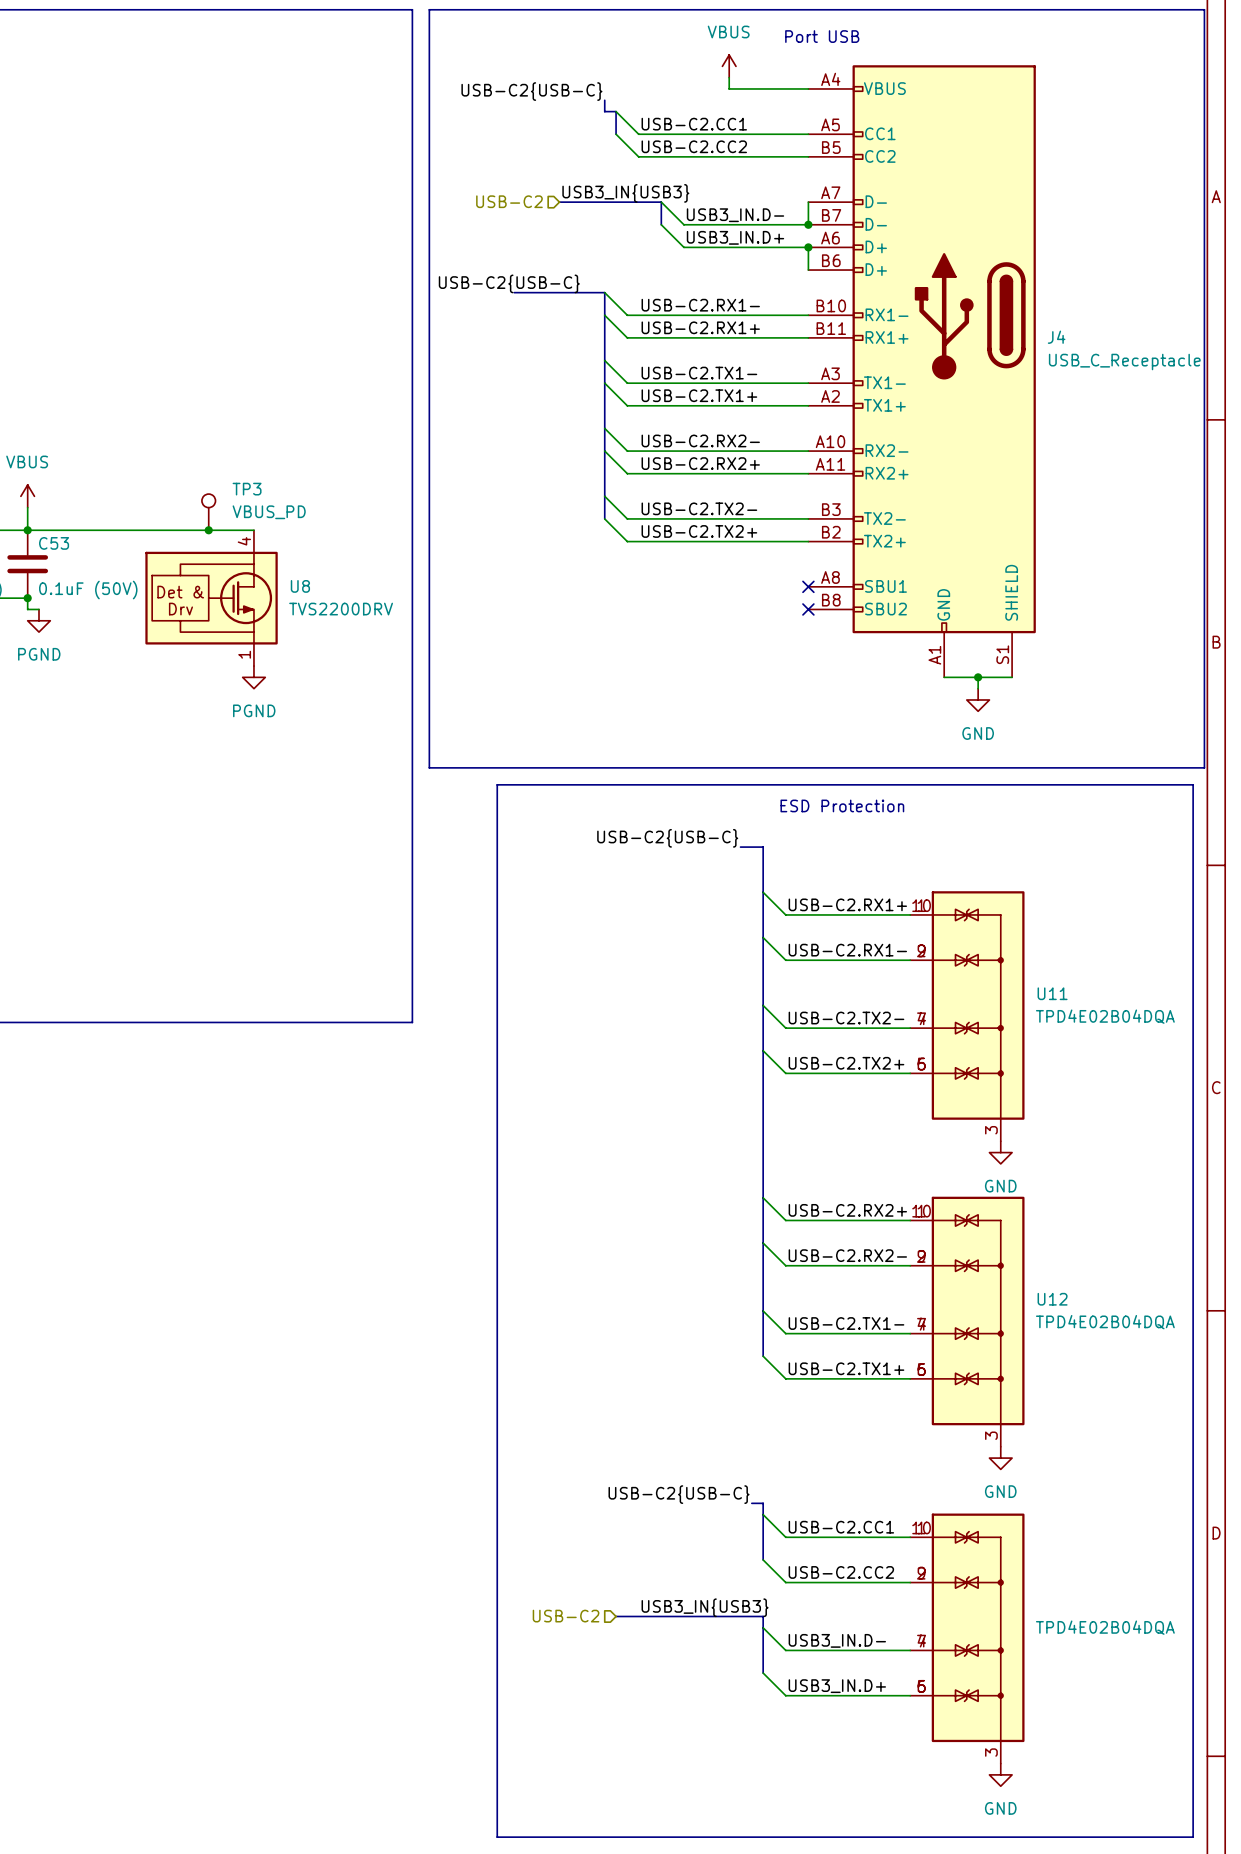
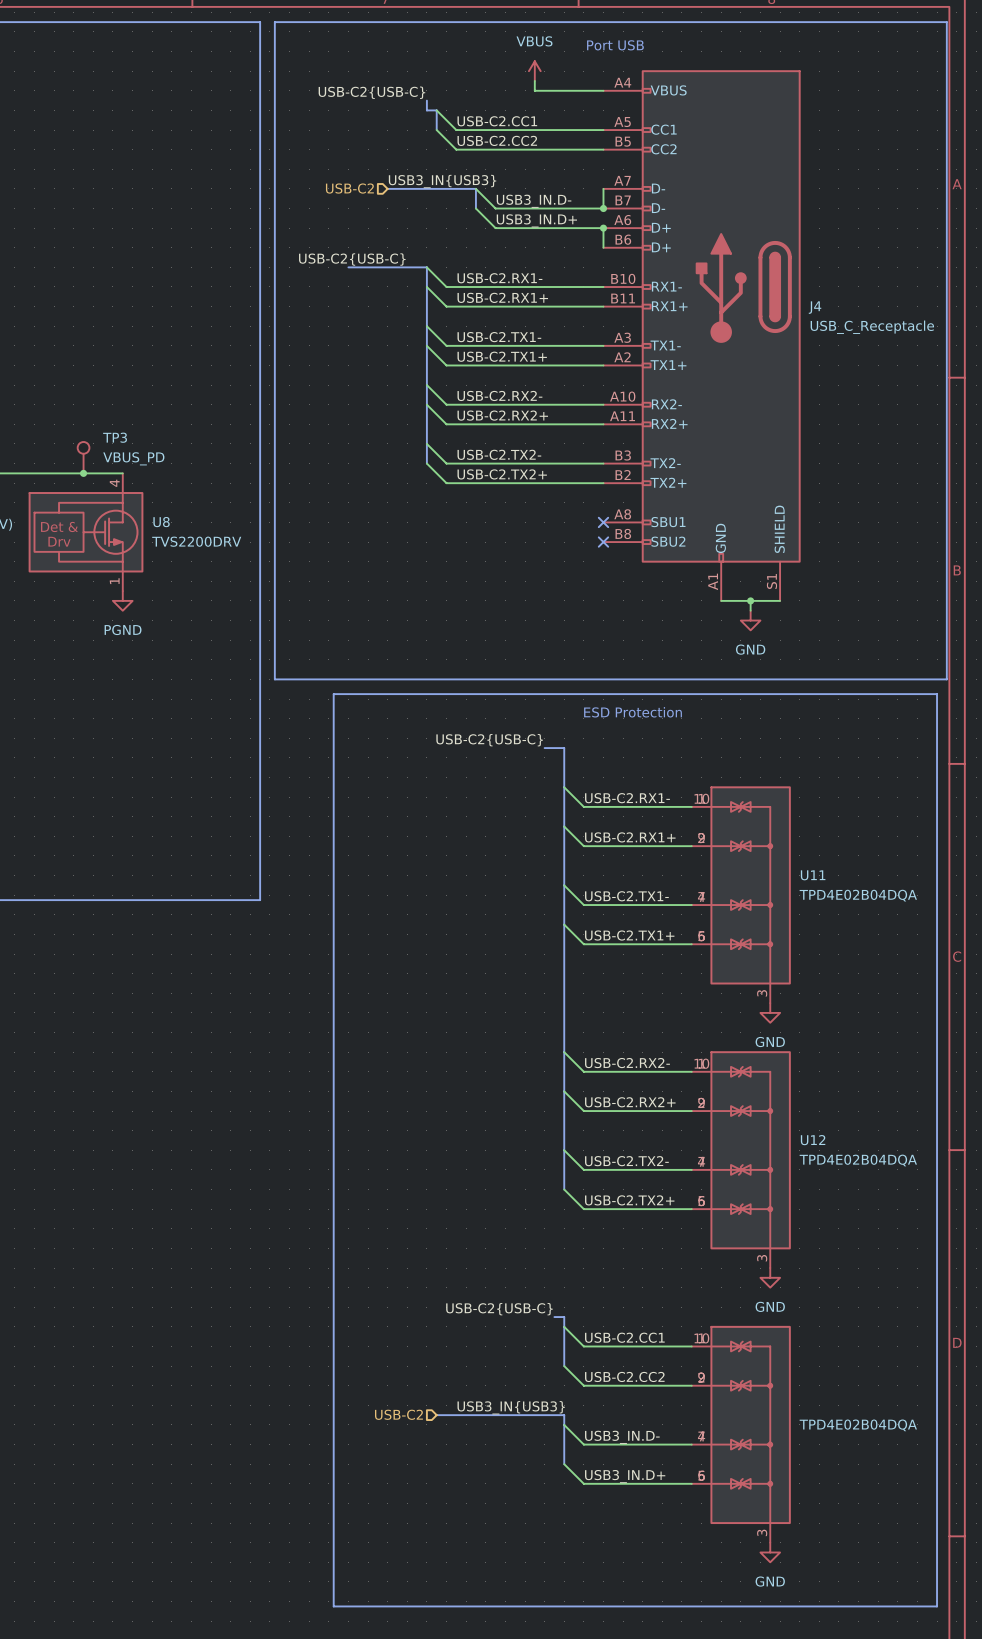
label: USB-C2.RX1+ (847, 904) -> USB-C2.RX1- (627, 798)
label: USB-C2.RX1- (847, 950) -> USB-C2.RX1+ (630, 837)
label: USB-C2.TX2- (846, 1018) -> USB-C2.TX1- (626, 896)
label: USB-C2.TX2+ (846, 1063) -> USB-C2.TX1+ (629, 935)
label: USB-C2.RX2+ (847, 1210) -> USB-C2.RX2- (627, 1063)
label: USB-C2.RX2- (847, 1255) -> USB-C2.RX2+ (630, 1102)
label: USB-C2.TX1- (846, 1323) -> USB-C2.TX2- (626, 1161)
label: USB-C2.TX1+ (846, 1368) -> USB-C2.TX2+ (629, 1200)

